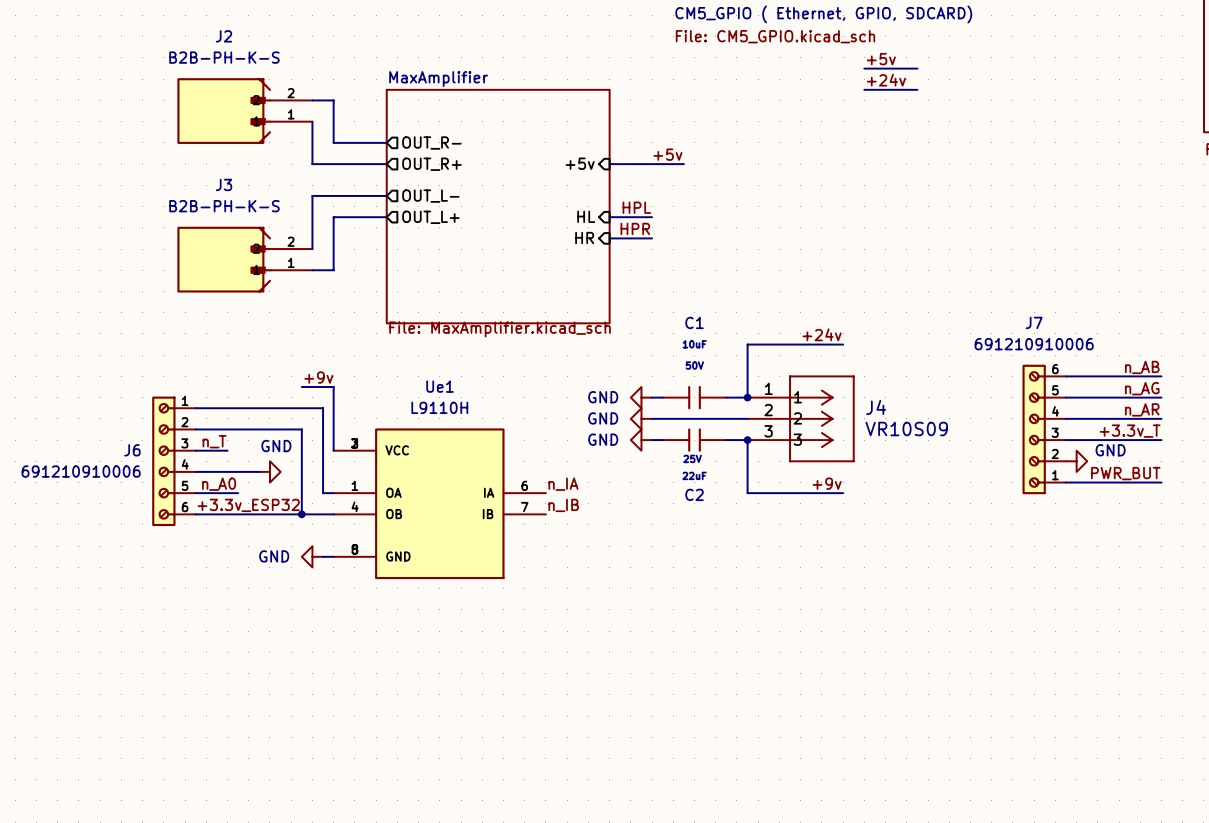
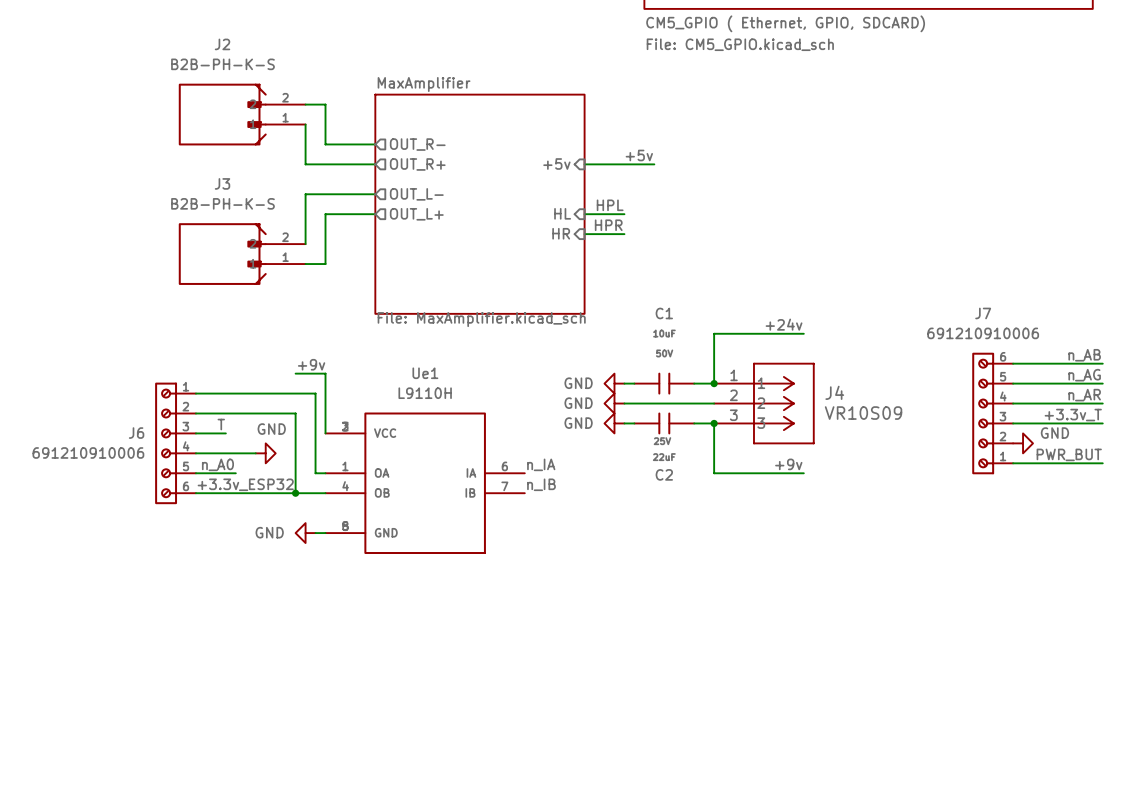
label: +5v (881, 59) -> none
wire: (864, 68) (917, 68) -> none
label: +24v (886, 80) -> none
wire: (864, 89) (917, 89) -> none
label: n_T (214, 441) -> T (221, 424)

